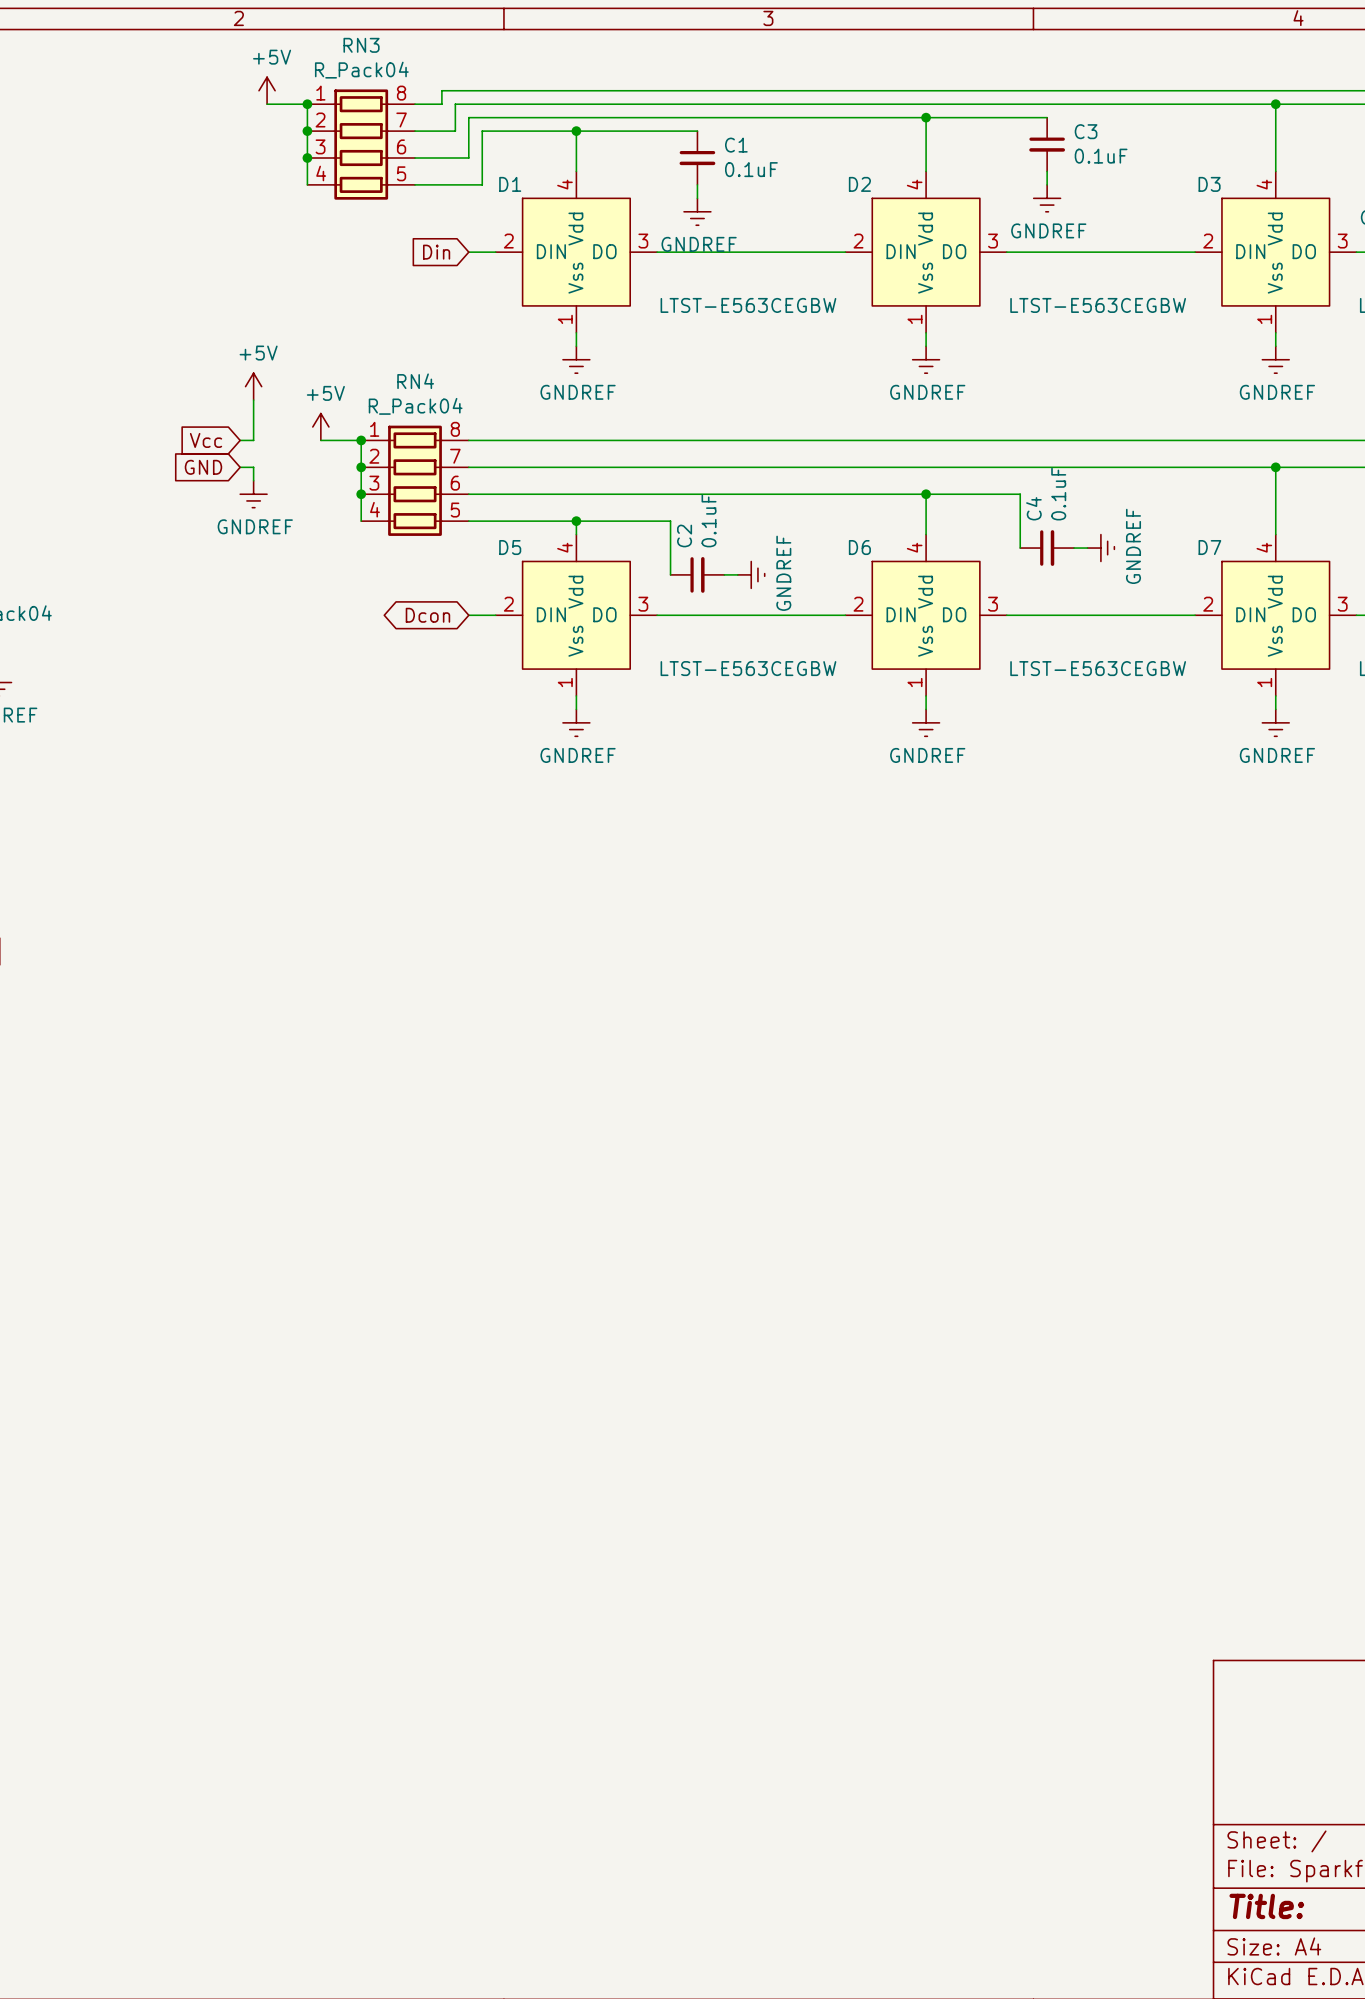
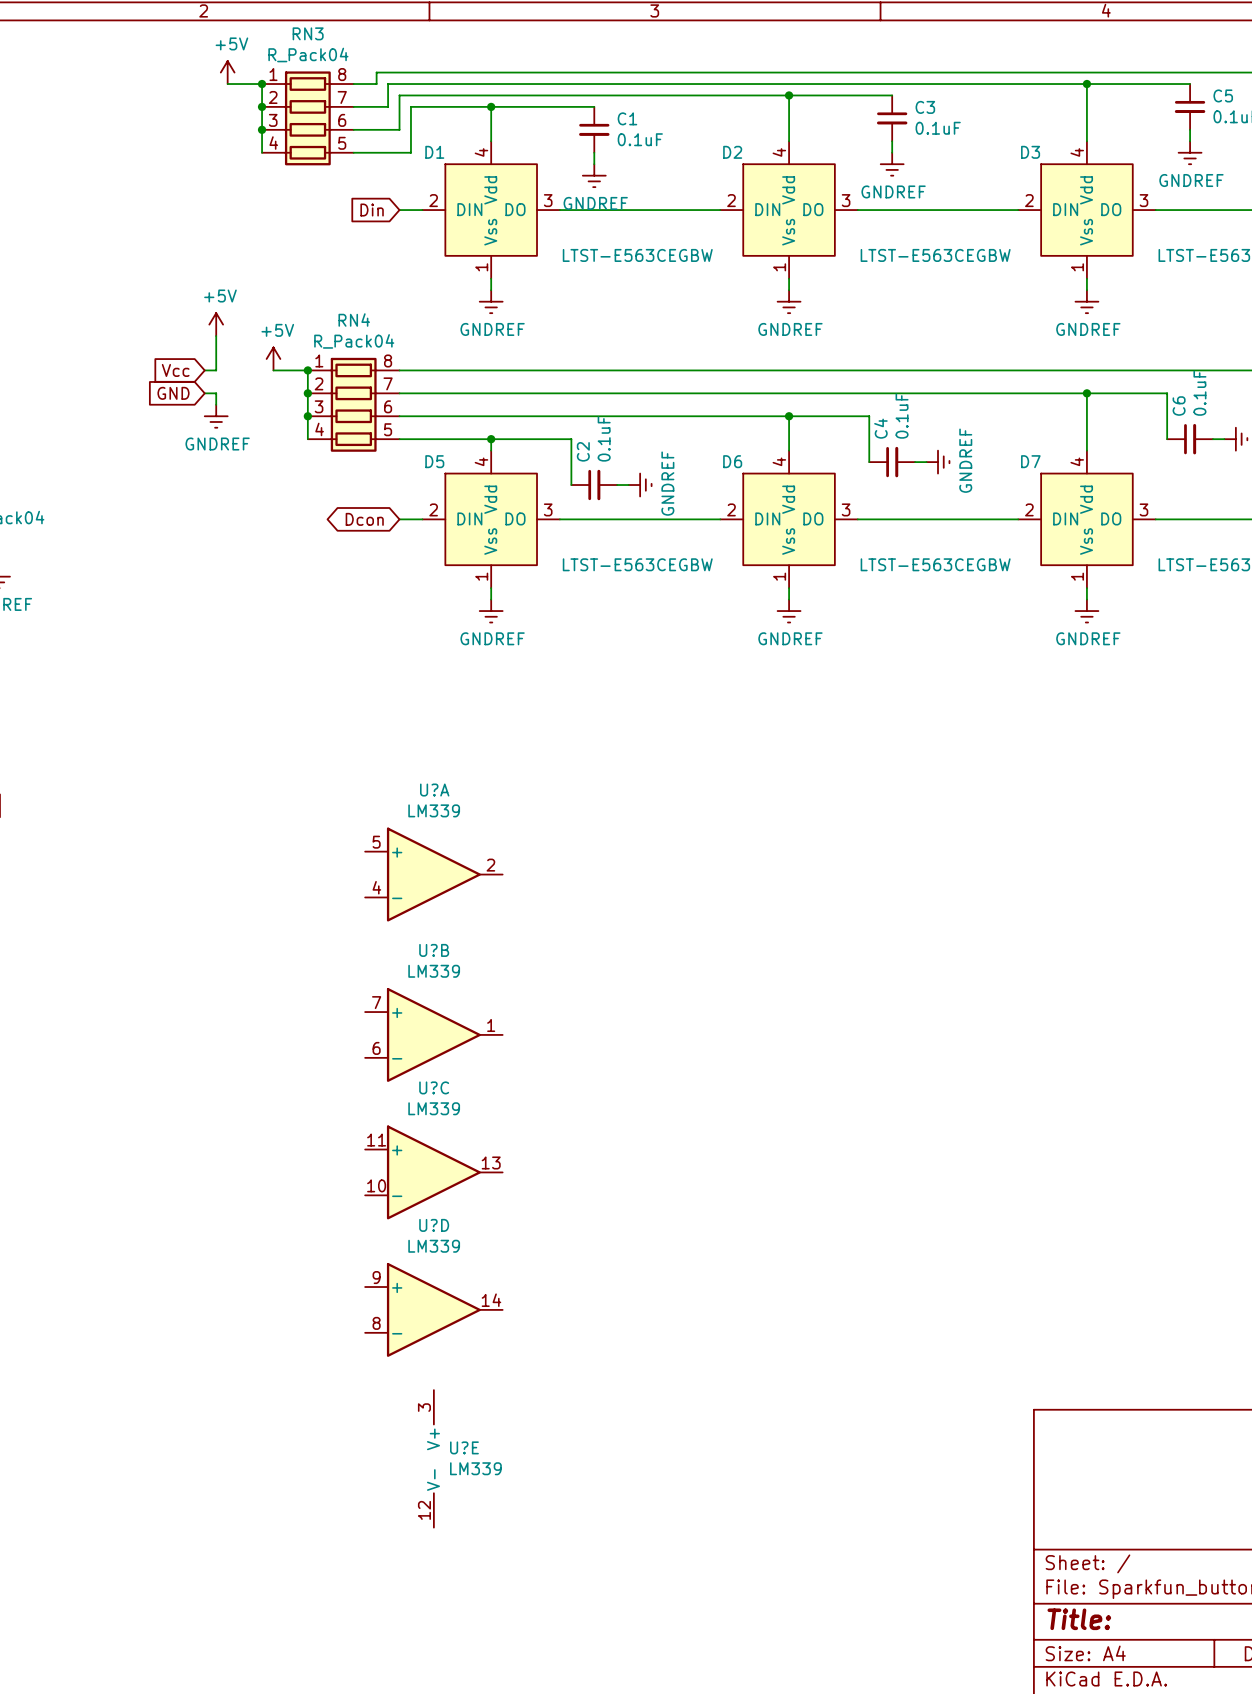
U?A: none -> LM339 (433, 874)
U?B: none -> LM339 (433, 1034)
U?C: none -> LM339 (433, 1172)
U?D: none -> LM339 (433, 1309)
U?E: none -> LM339 (433, 1458)

